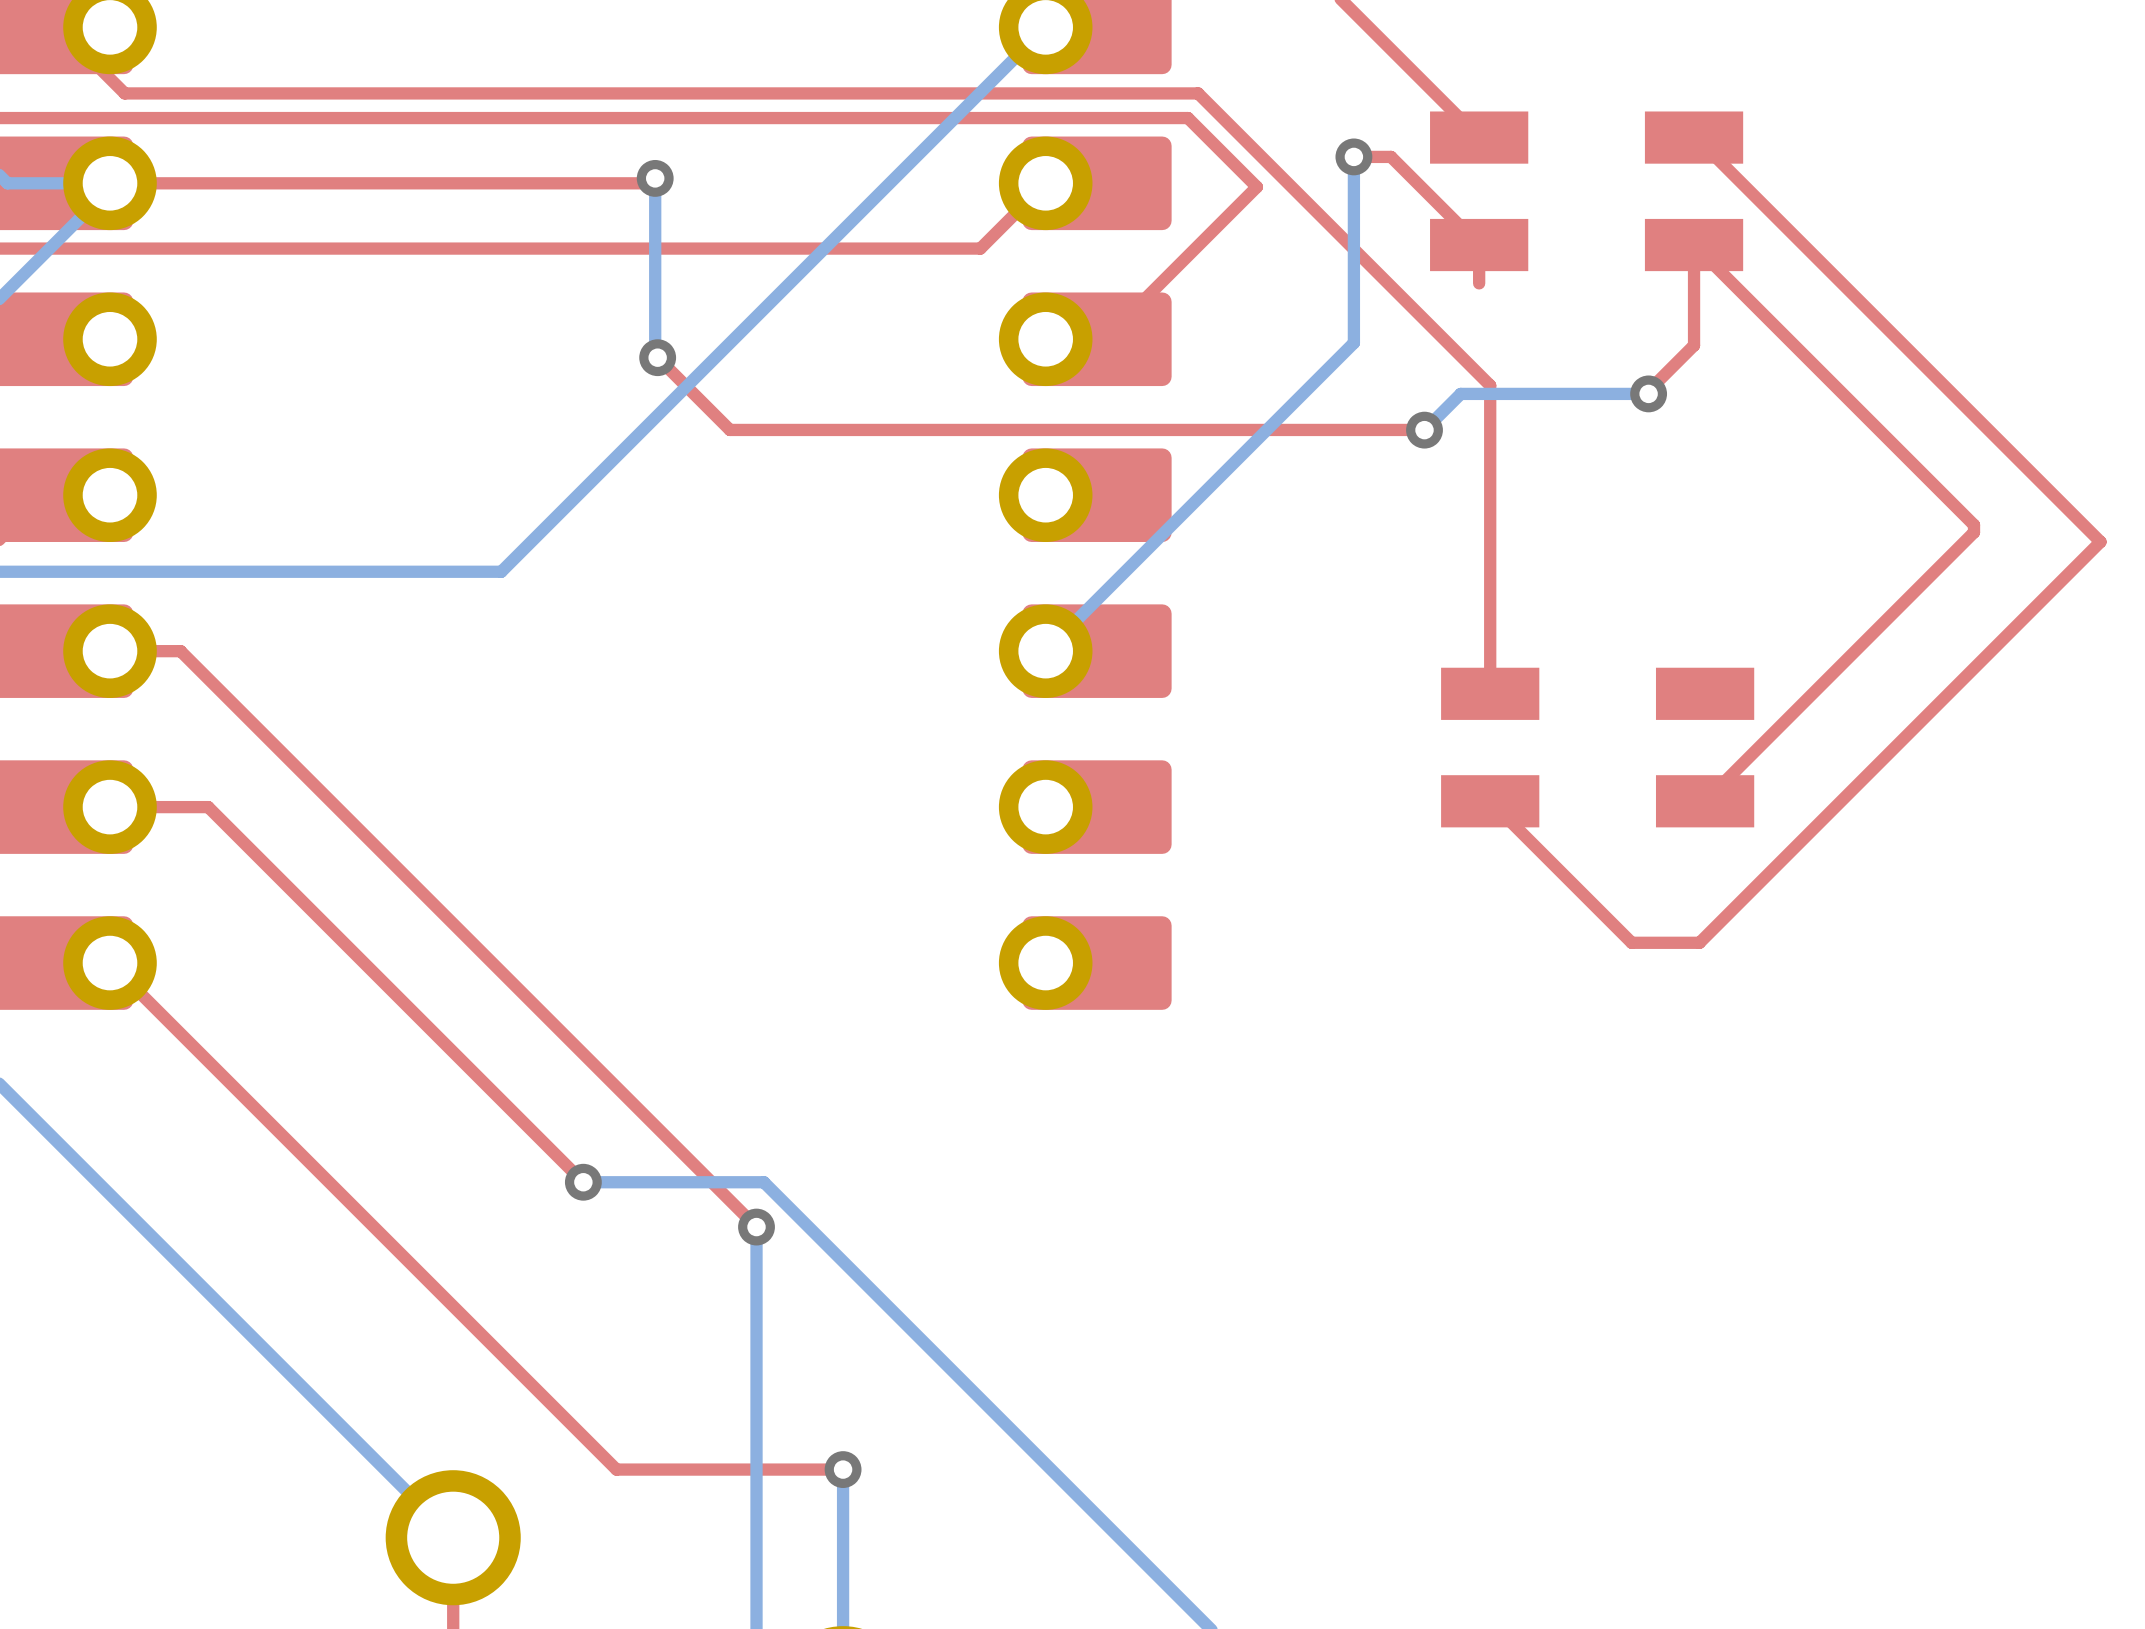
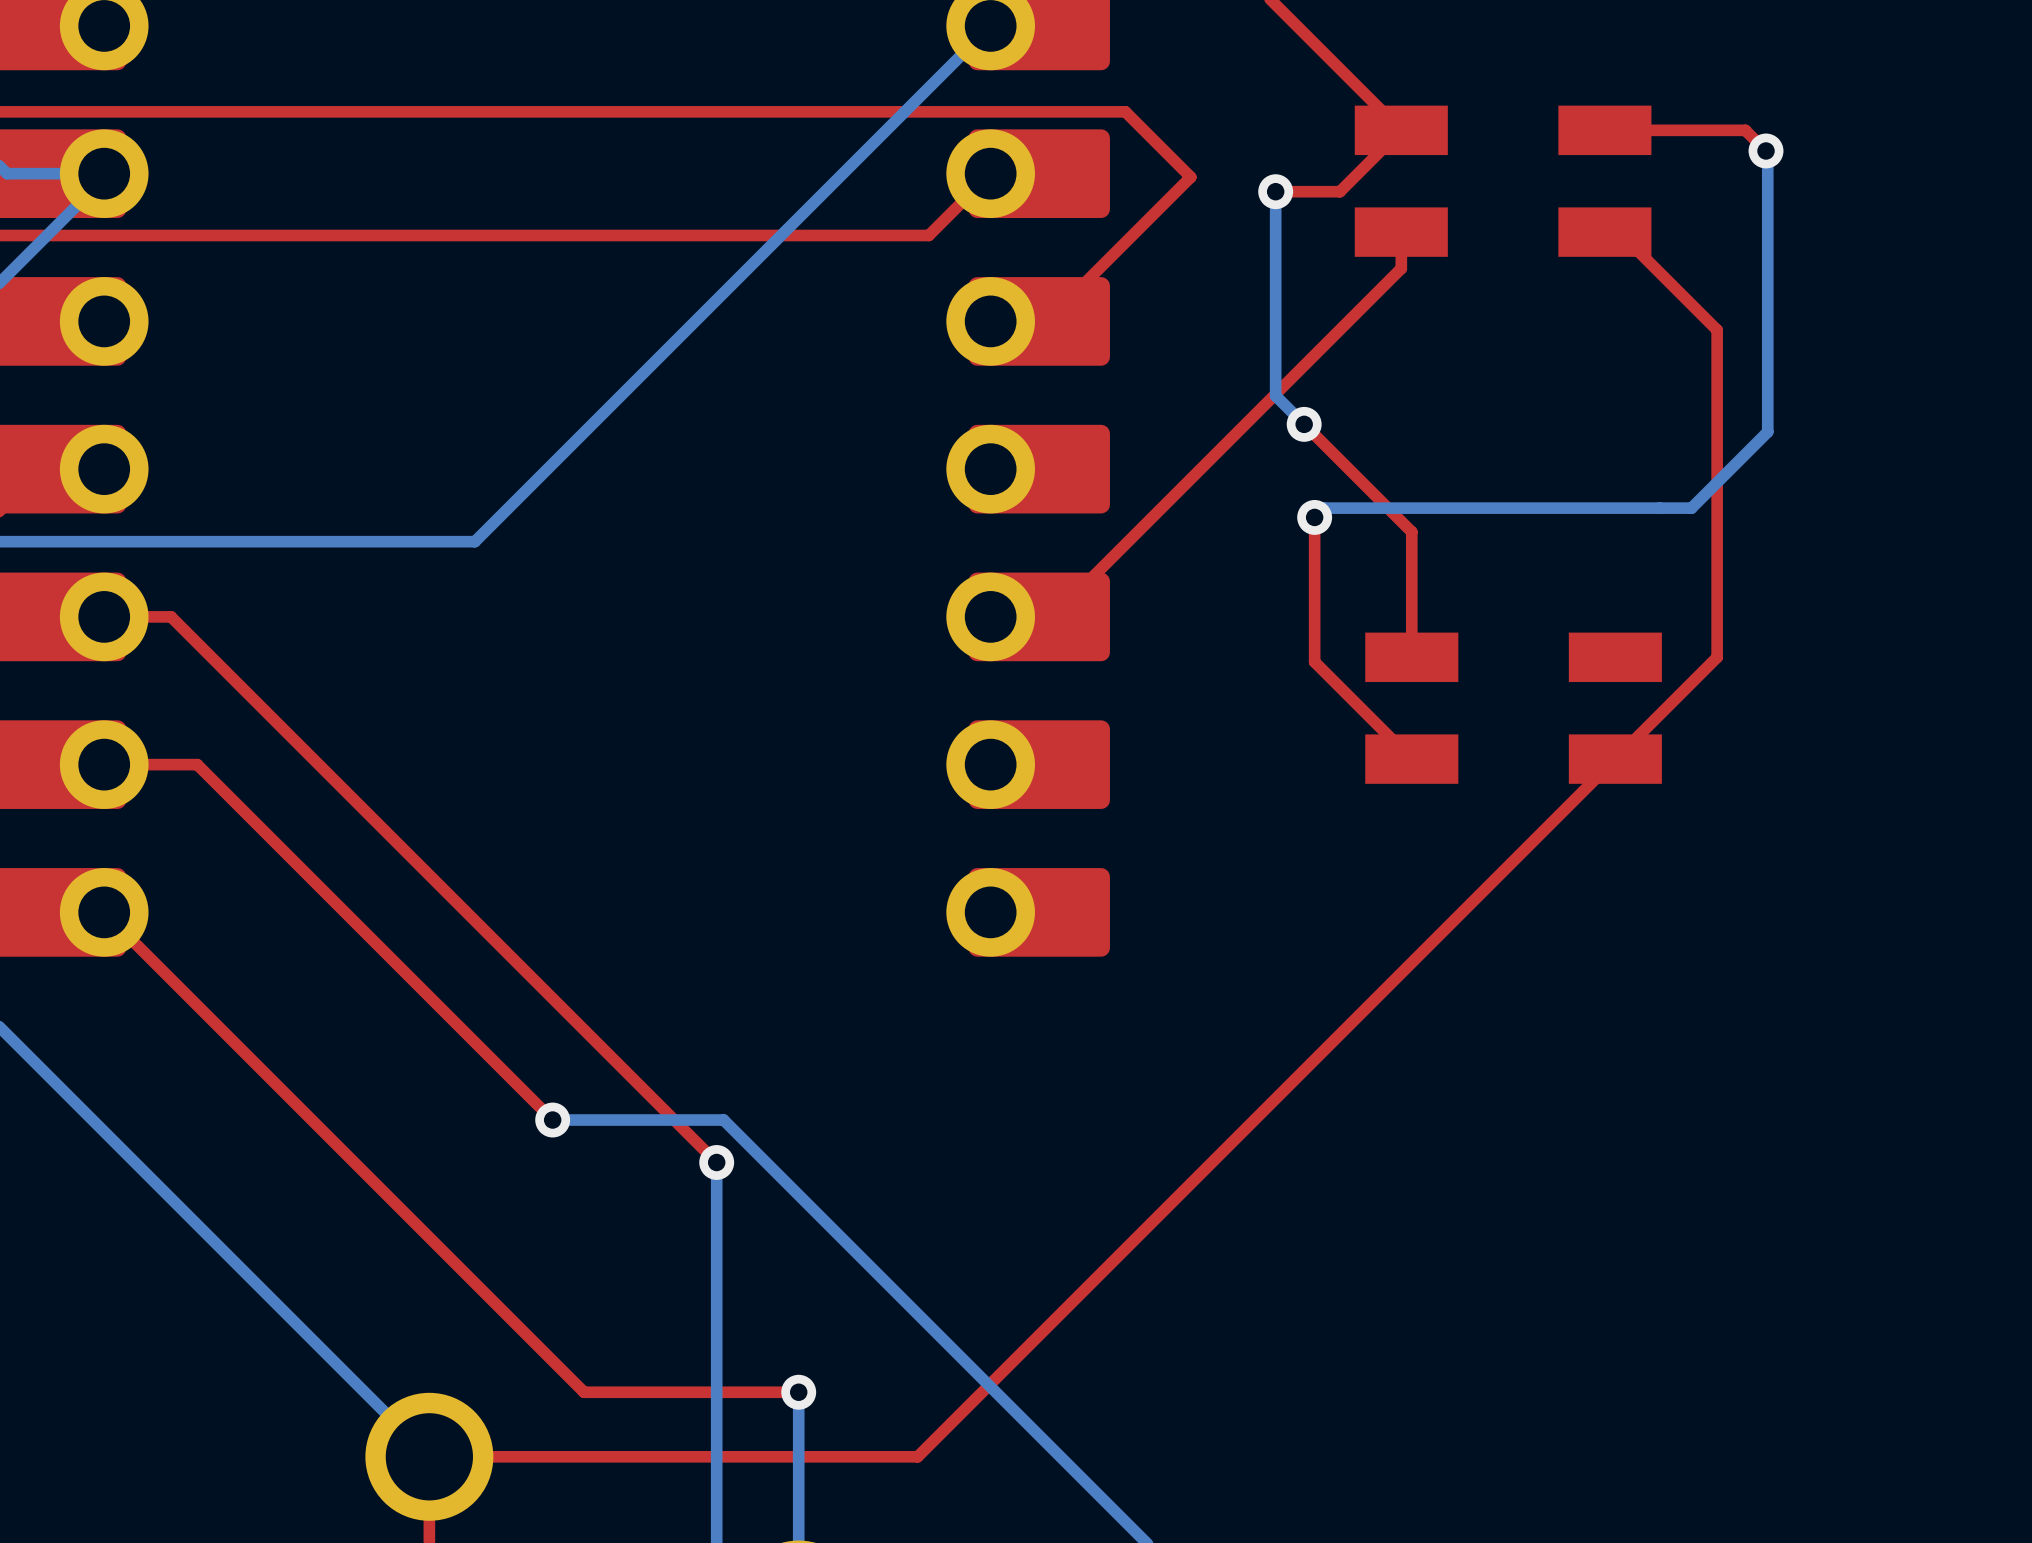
top track: (58, 27) (124, 93) (1198, 93) (1490, 385) (1490, 561) -> (1304, 424) (1411, 531)
top track: none -> (1401, 130) (1339, 191) (1275, 191)
top track: (1696, 137) (2100, 541) (1699, 942) (1631, 942) (1490, 801) -> (1314, 517) (1314, 661) (1411, 759)
top track: none -> (1606, 130) (1745, 130) (1766, 150)
top track: (1353, 156) (1391, 156) (1479, 245) -> none
bottom track: (1353, 156) (1353, 342) (1045, 651) -> none
via position: (1353, 156) -> (1275, 191)
bottom track: none -> (1766, 150) (1767, 152) (1767, 431) (1691, 508) (1323, 508) (1314, 517)
via: none -> (1766, 150)
top track: (655, 178) (650, 183) (110, 183) -> none
bottom track: (655, 178) (655, 355) (657, 357) -> none
via: (655, 178) -> none
bottom track: none -> (1275, 191) (1275, 395) (1304, 424)
top track: none -> (1401, 268) (1052, 616)
top track: (657, 357) (729, 429) (1424, 429) -> none
via: (657, 357) -> none
top track: (1648, 393) (1648, 390) (1694, 345) (1694, 245) (1974, 524) (1974, 532) (1812, 693) -> (1619, 232) (1717, 330) (1717, 657)
bottom track: (1648, 393) (1460, 393) (1424, 430) -> none
via: (1648, 393) -> none
via position: (1424, 430) -> (1304, 424)
via: none -> (1314, 517)
top track: none -> (1615, 759) (917, 1456) (429, 1456)

